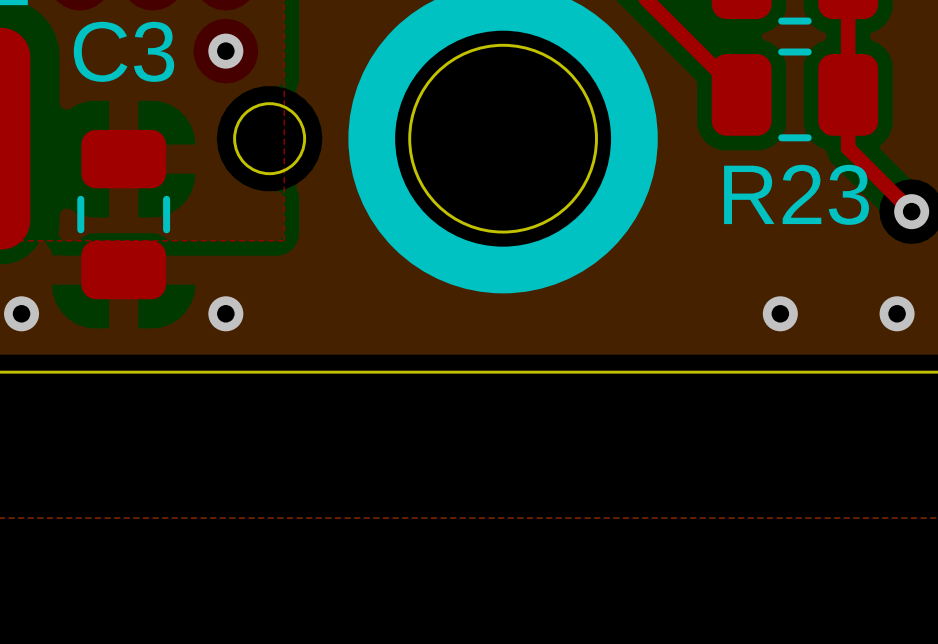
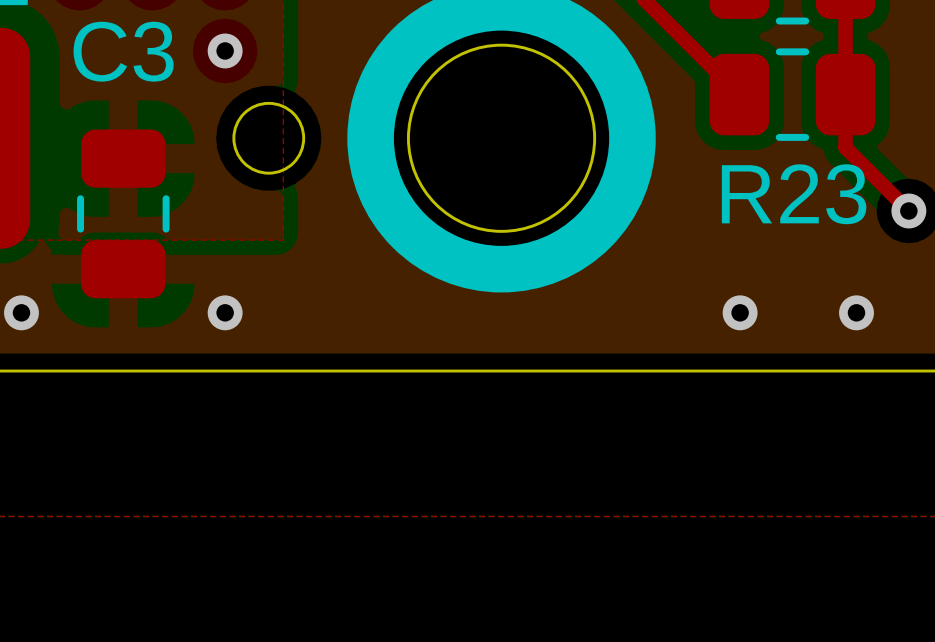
via position: (780, 313) -> (740, 312)
via position: (897, 313) -> (856, 312)

